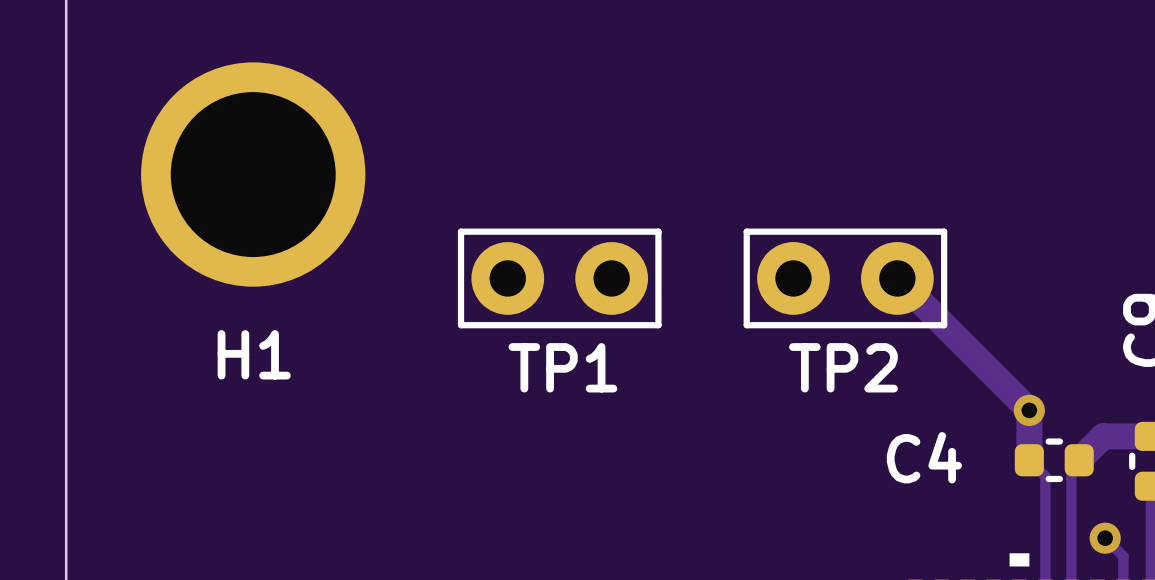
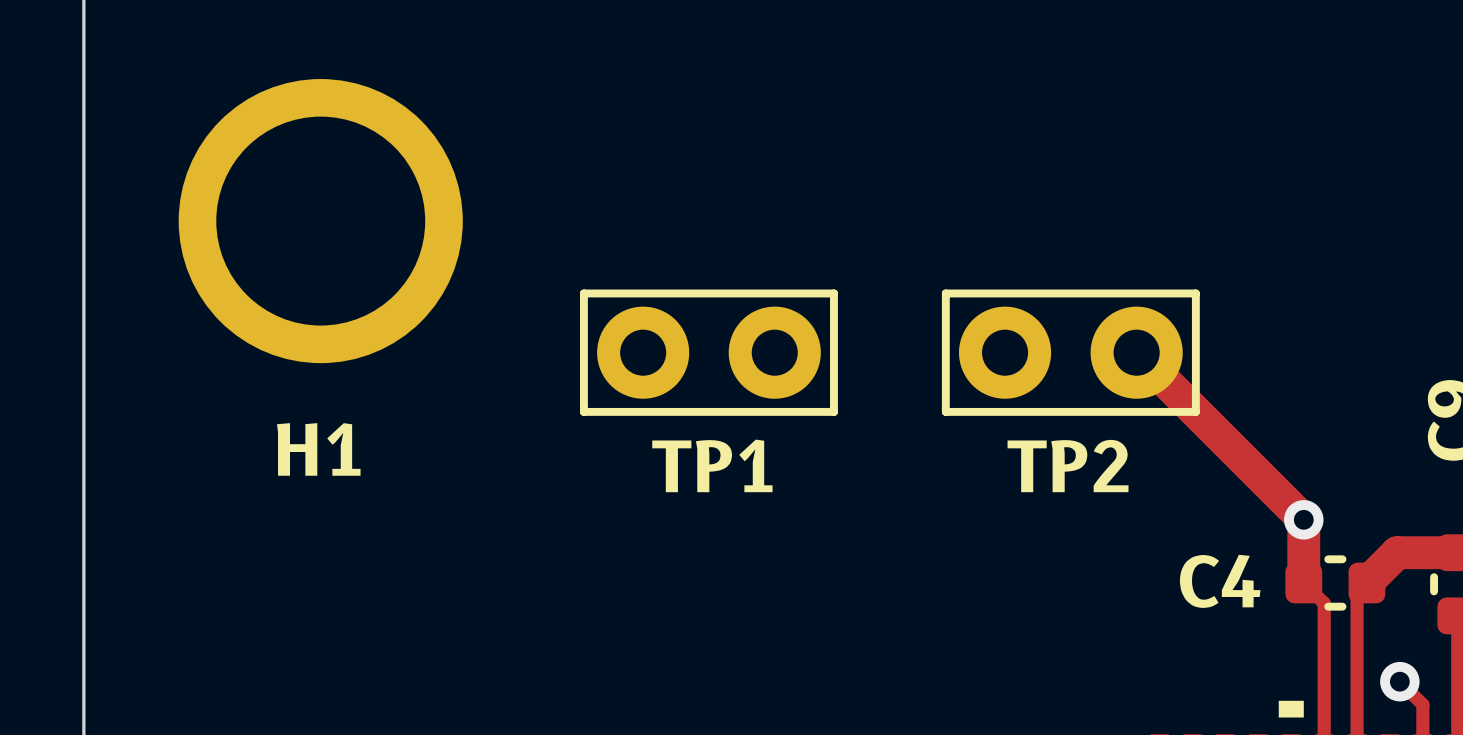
C4 name position: C4 (924, 457) -> C4 (1220, 581)

